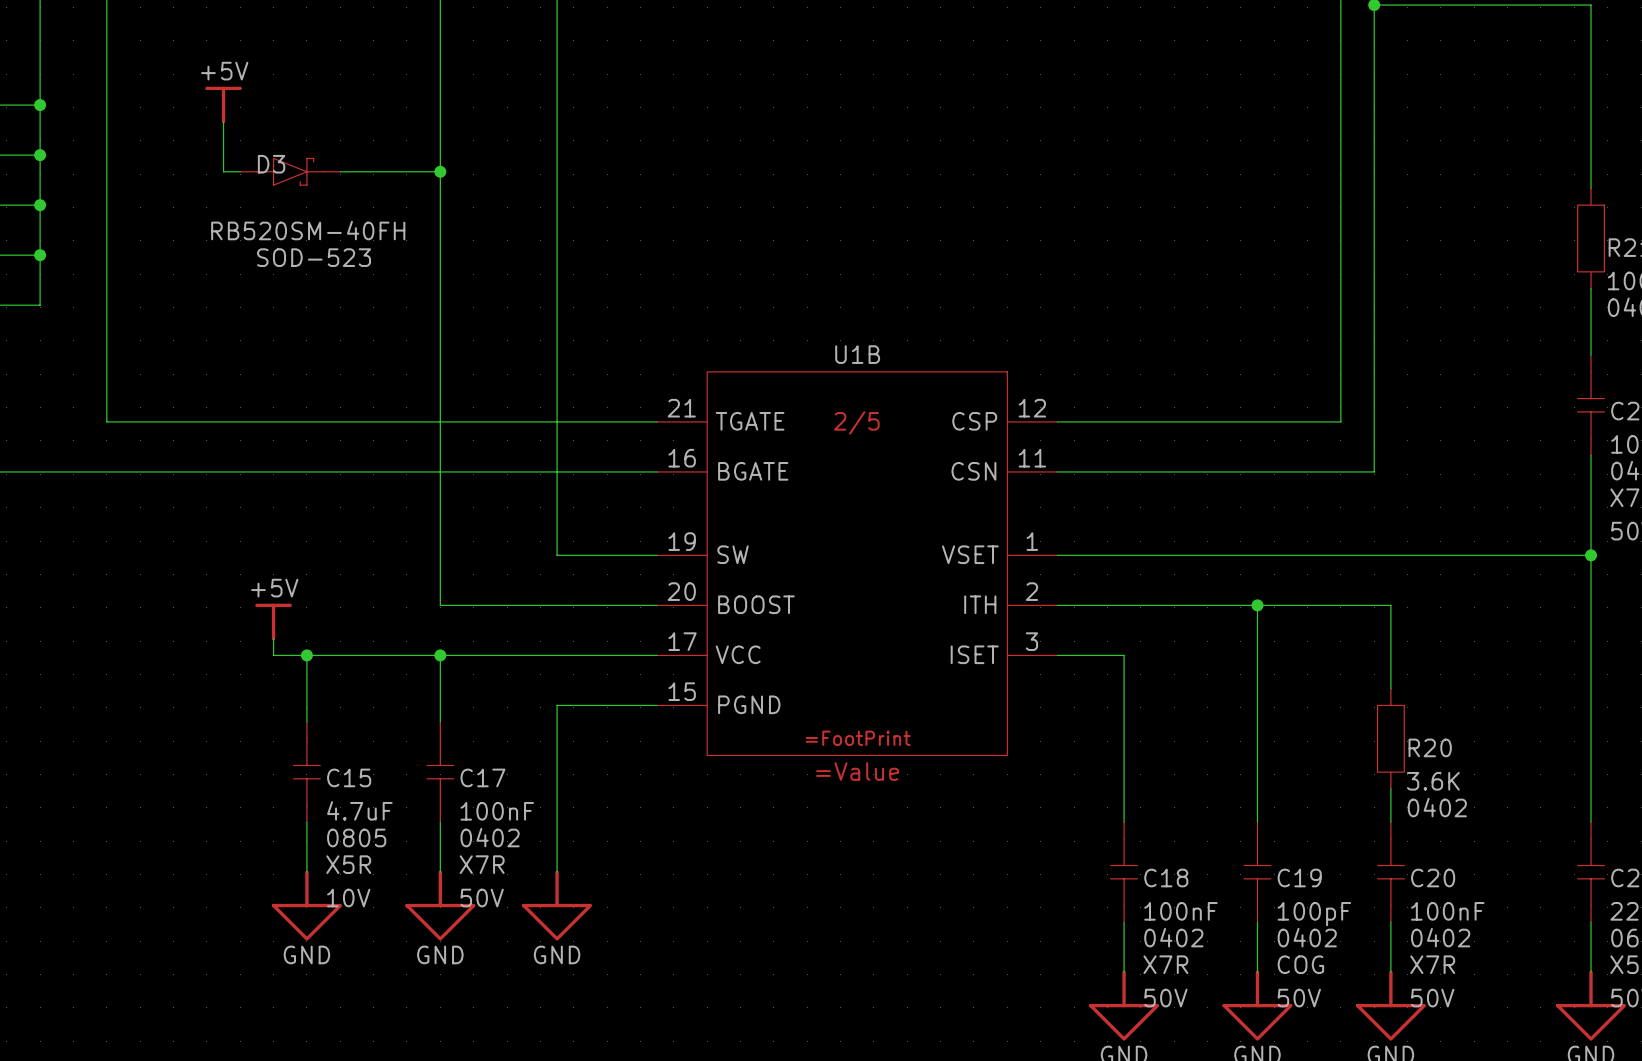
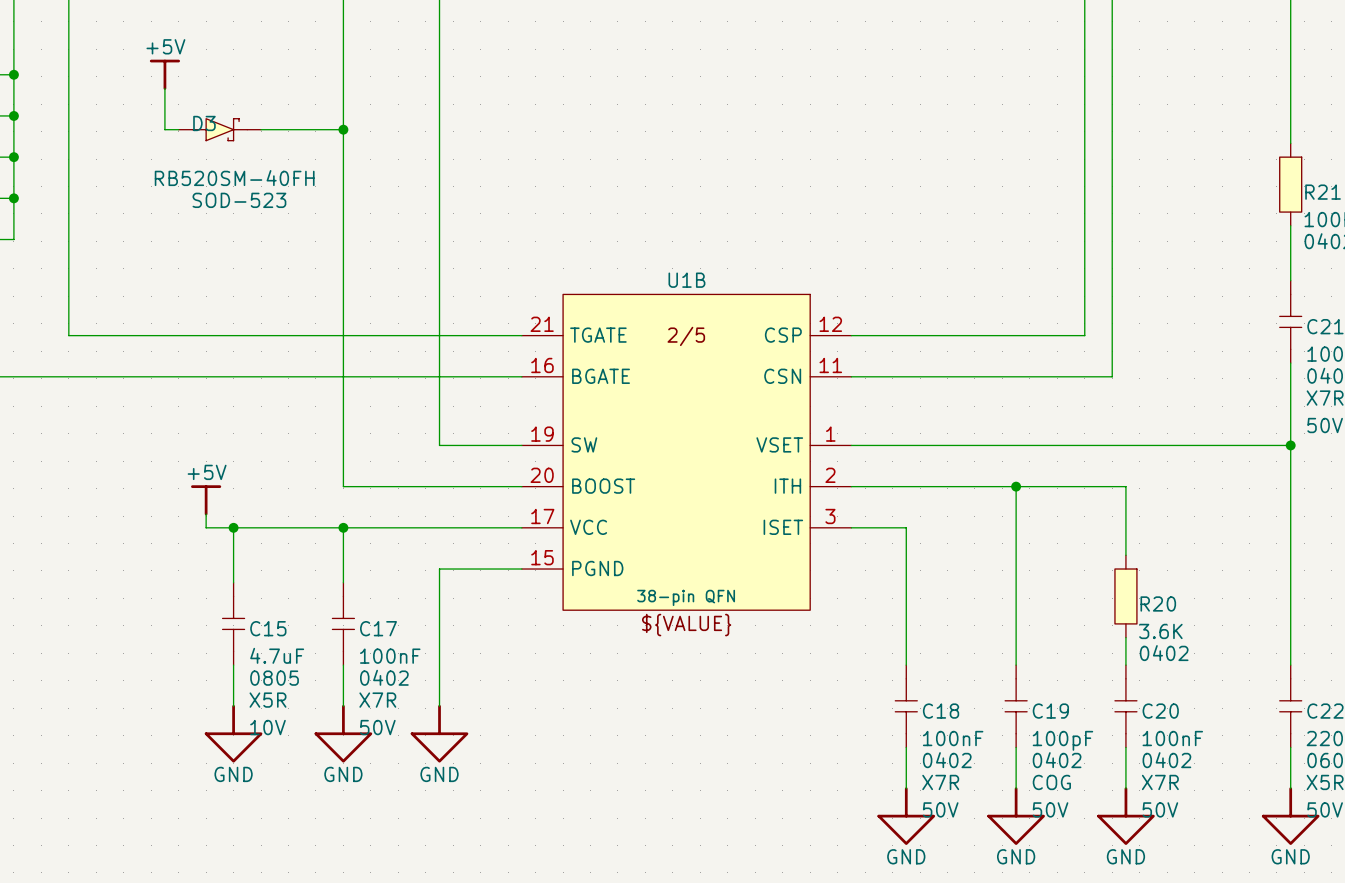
U1B text: =FootPrint (858, 738) -> none
U1B text: none -> 38-pin QFN (686, 597)
U1B text: =Value (857, 771) -> ${VALUE} (686, 625)

